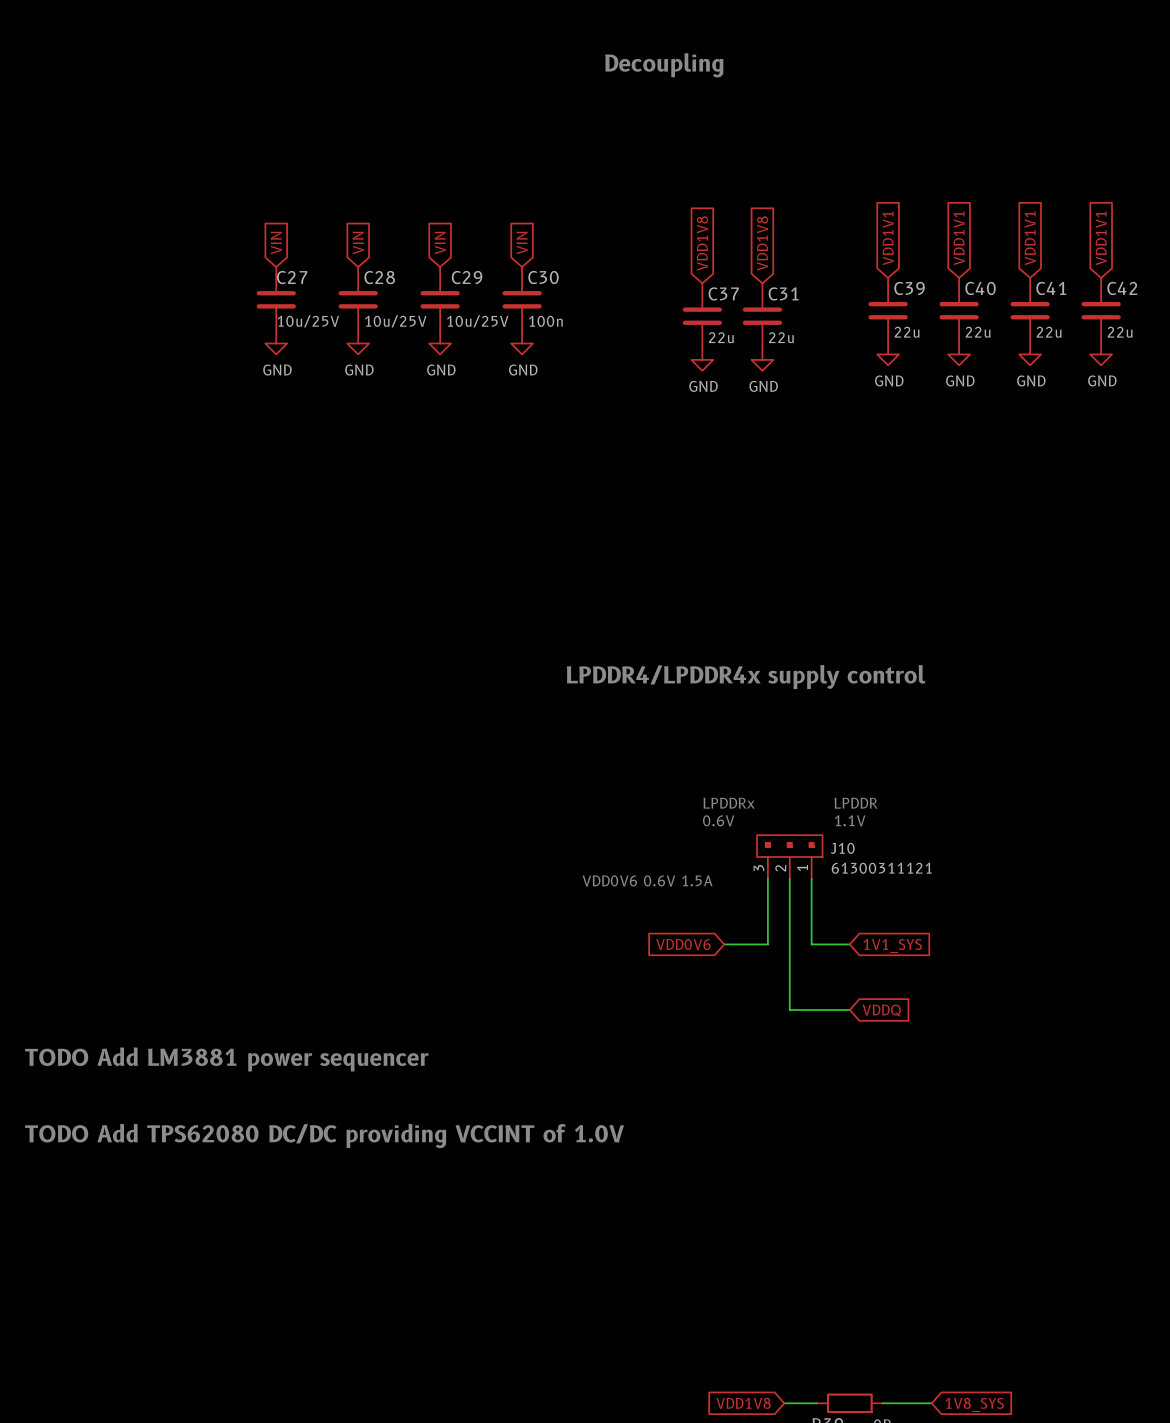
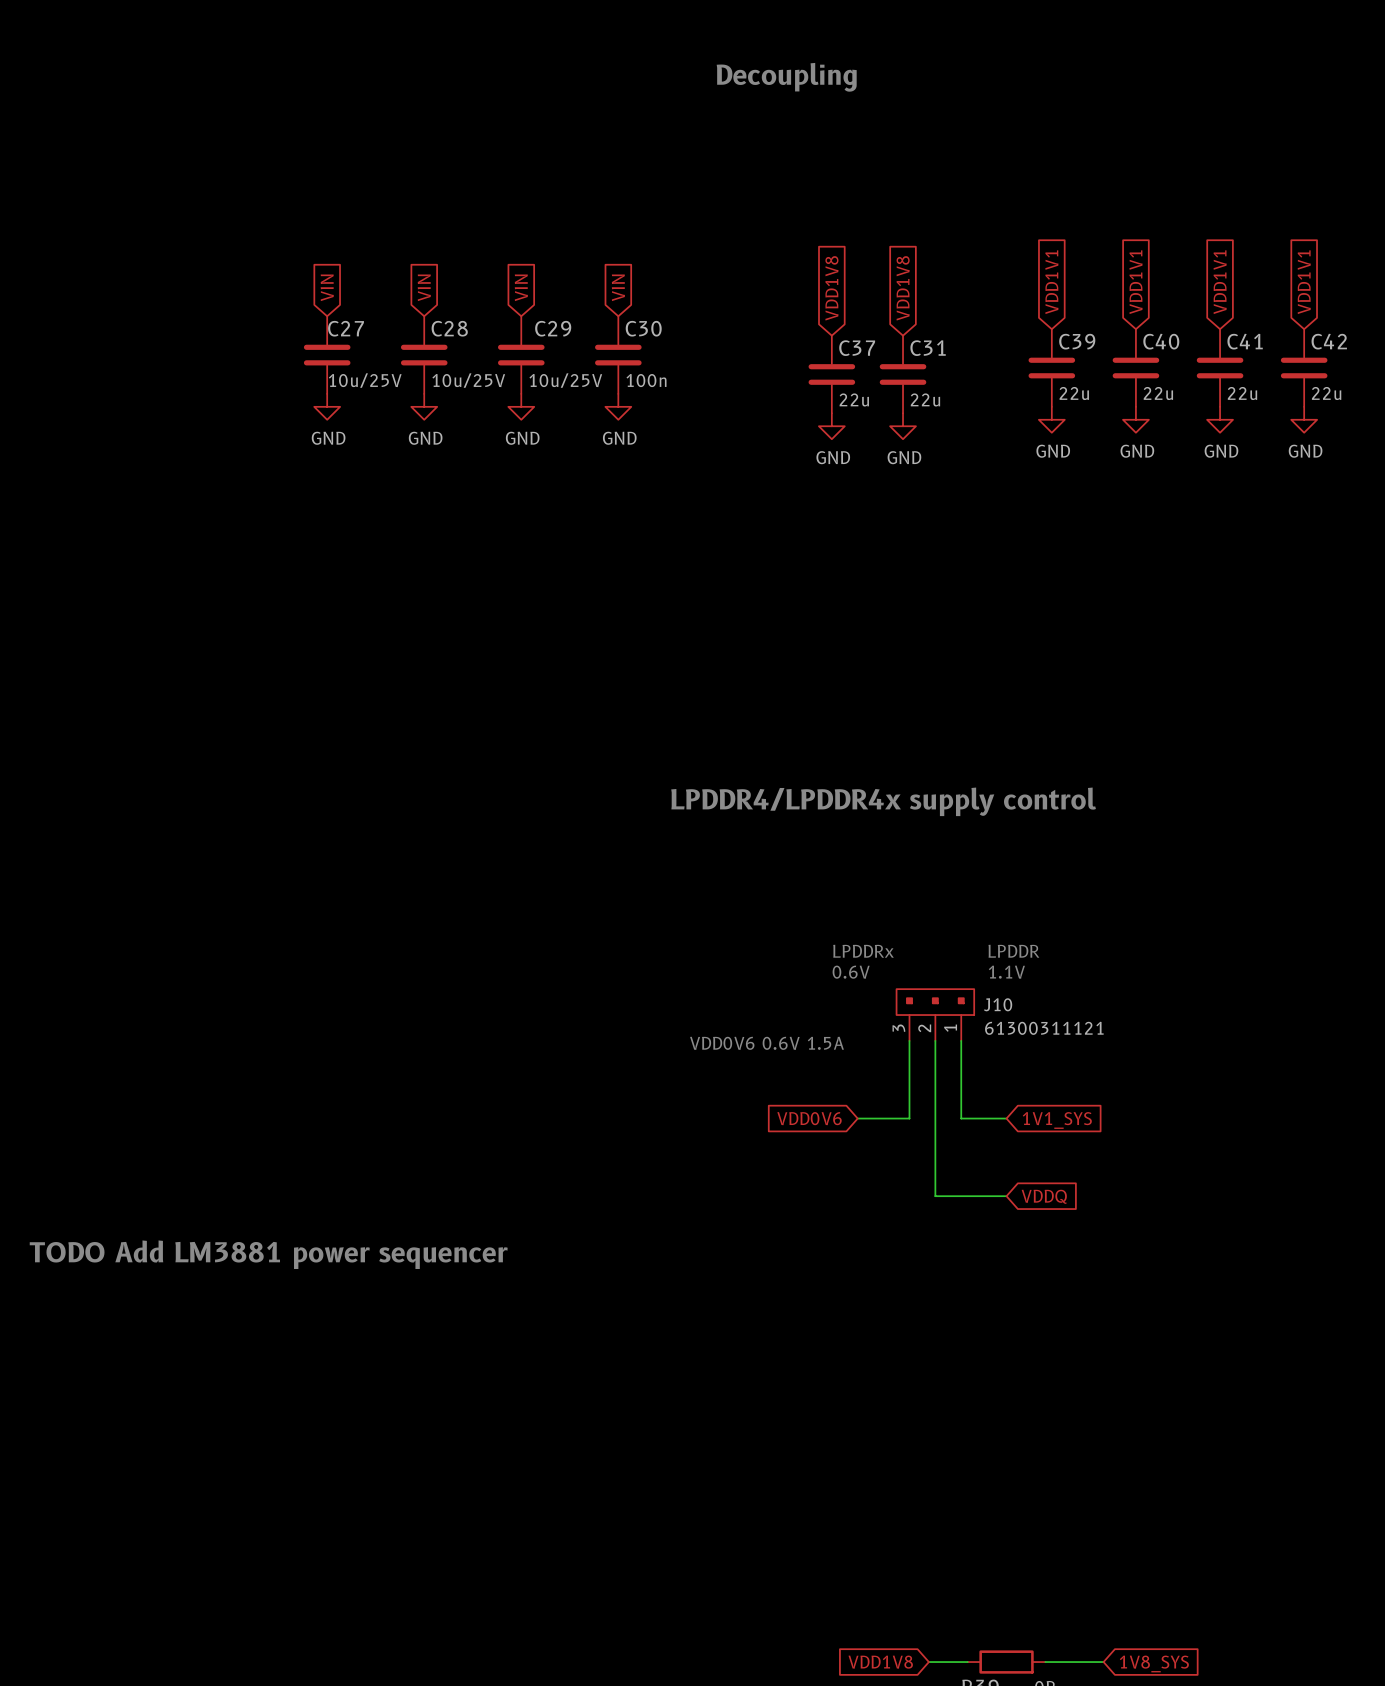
text: TODO Add TPS62080 DC/DC providing VCCINT of 1.0V (324, 1135) -> none

